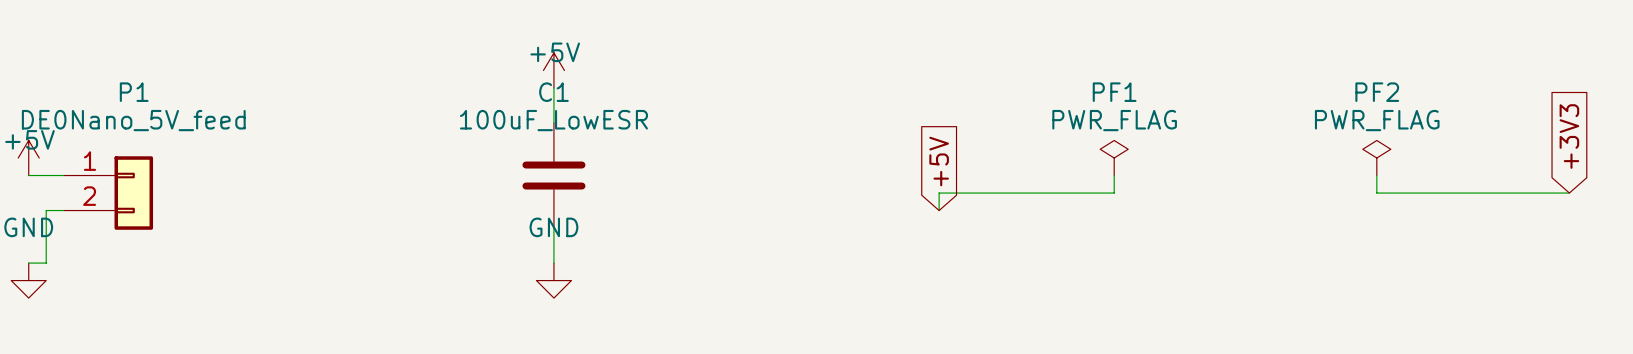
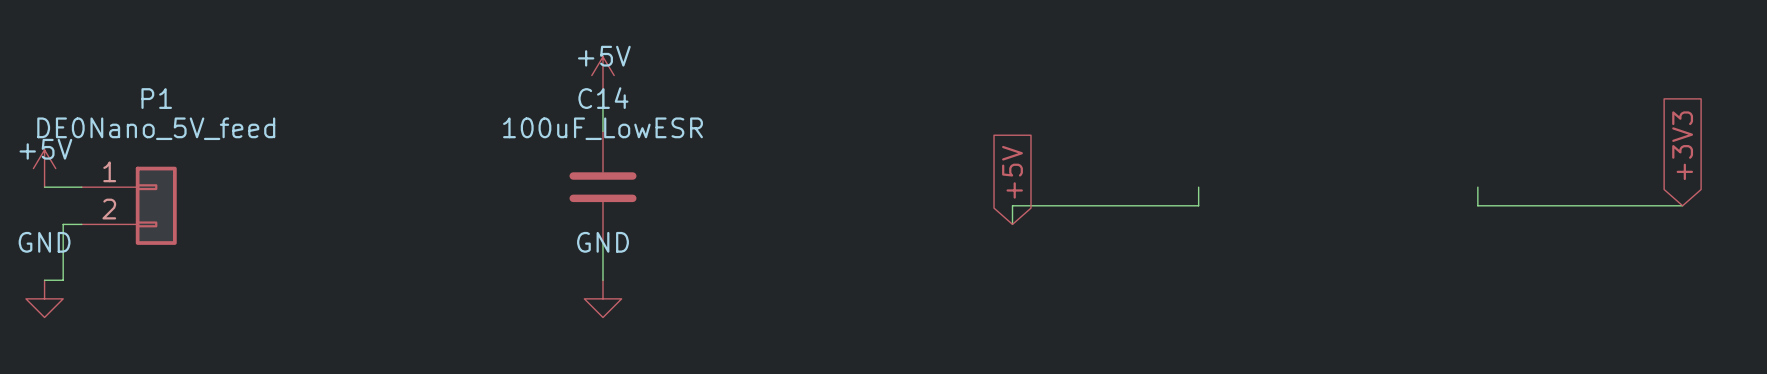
C1 name: C1 (553, 92) -> C14 (603, 98)
PF1: PWR_FLAG (1114, 158) -> none
PF2: PWR_FLAG (1376, 158) -> none

